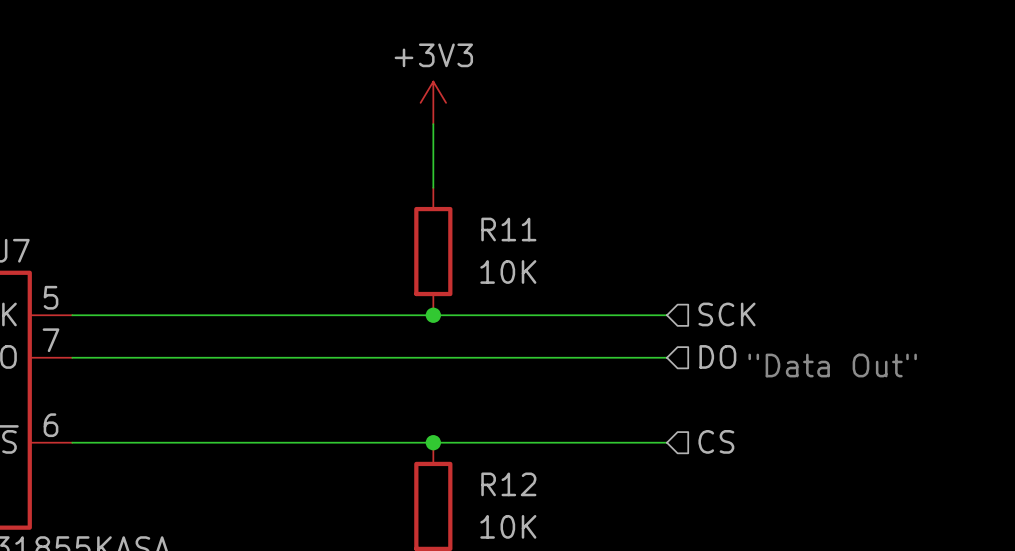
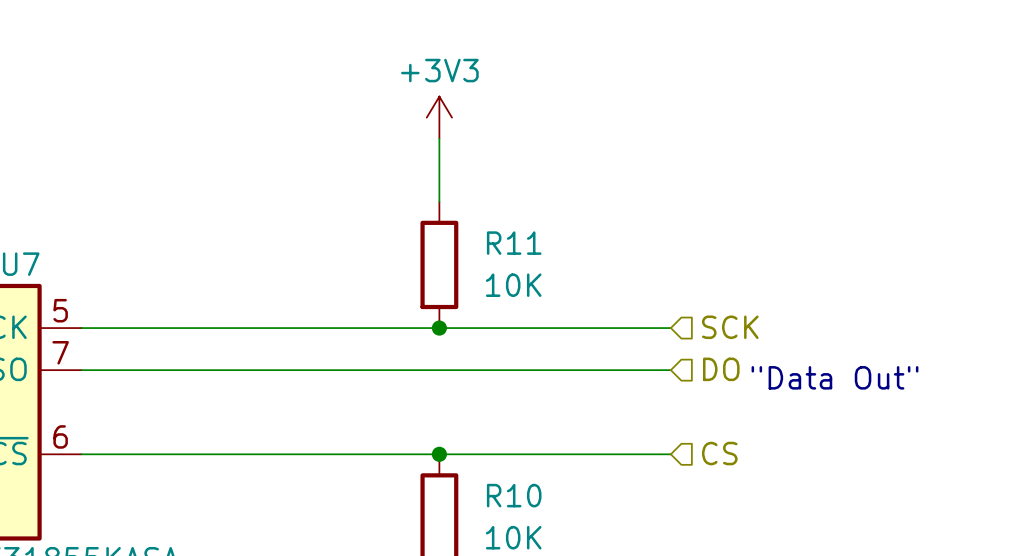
R12 name: R12 (508, 484) -> R10 (514, 495)

